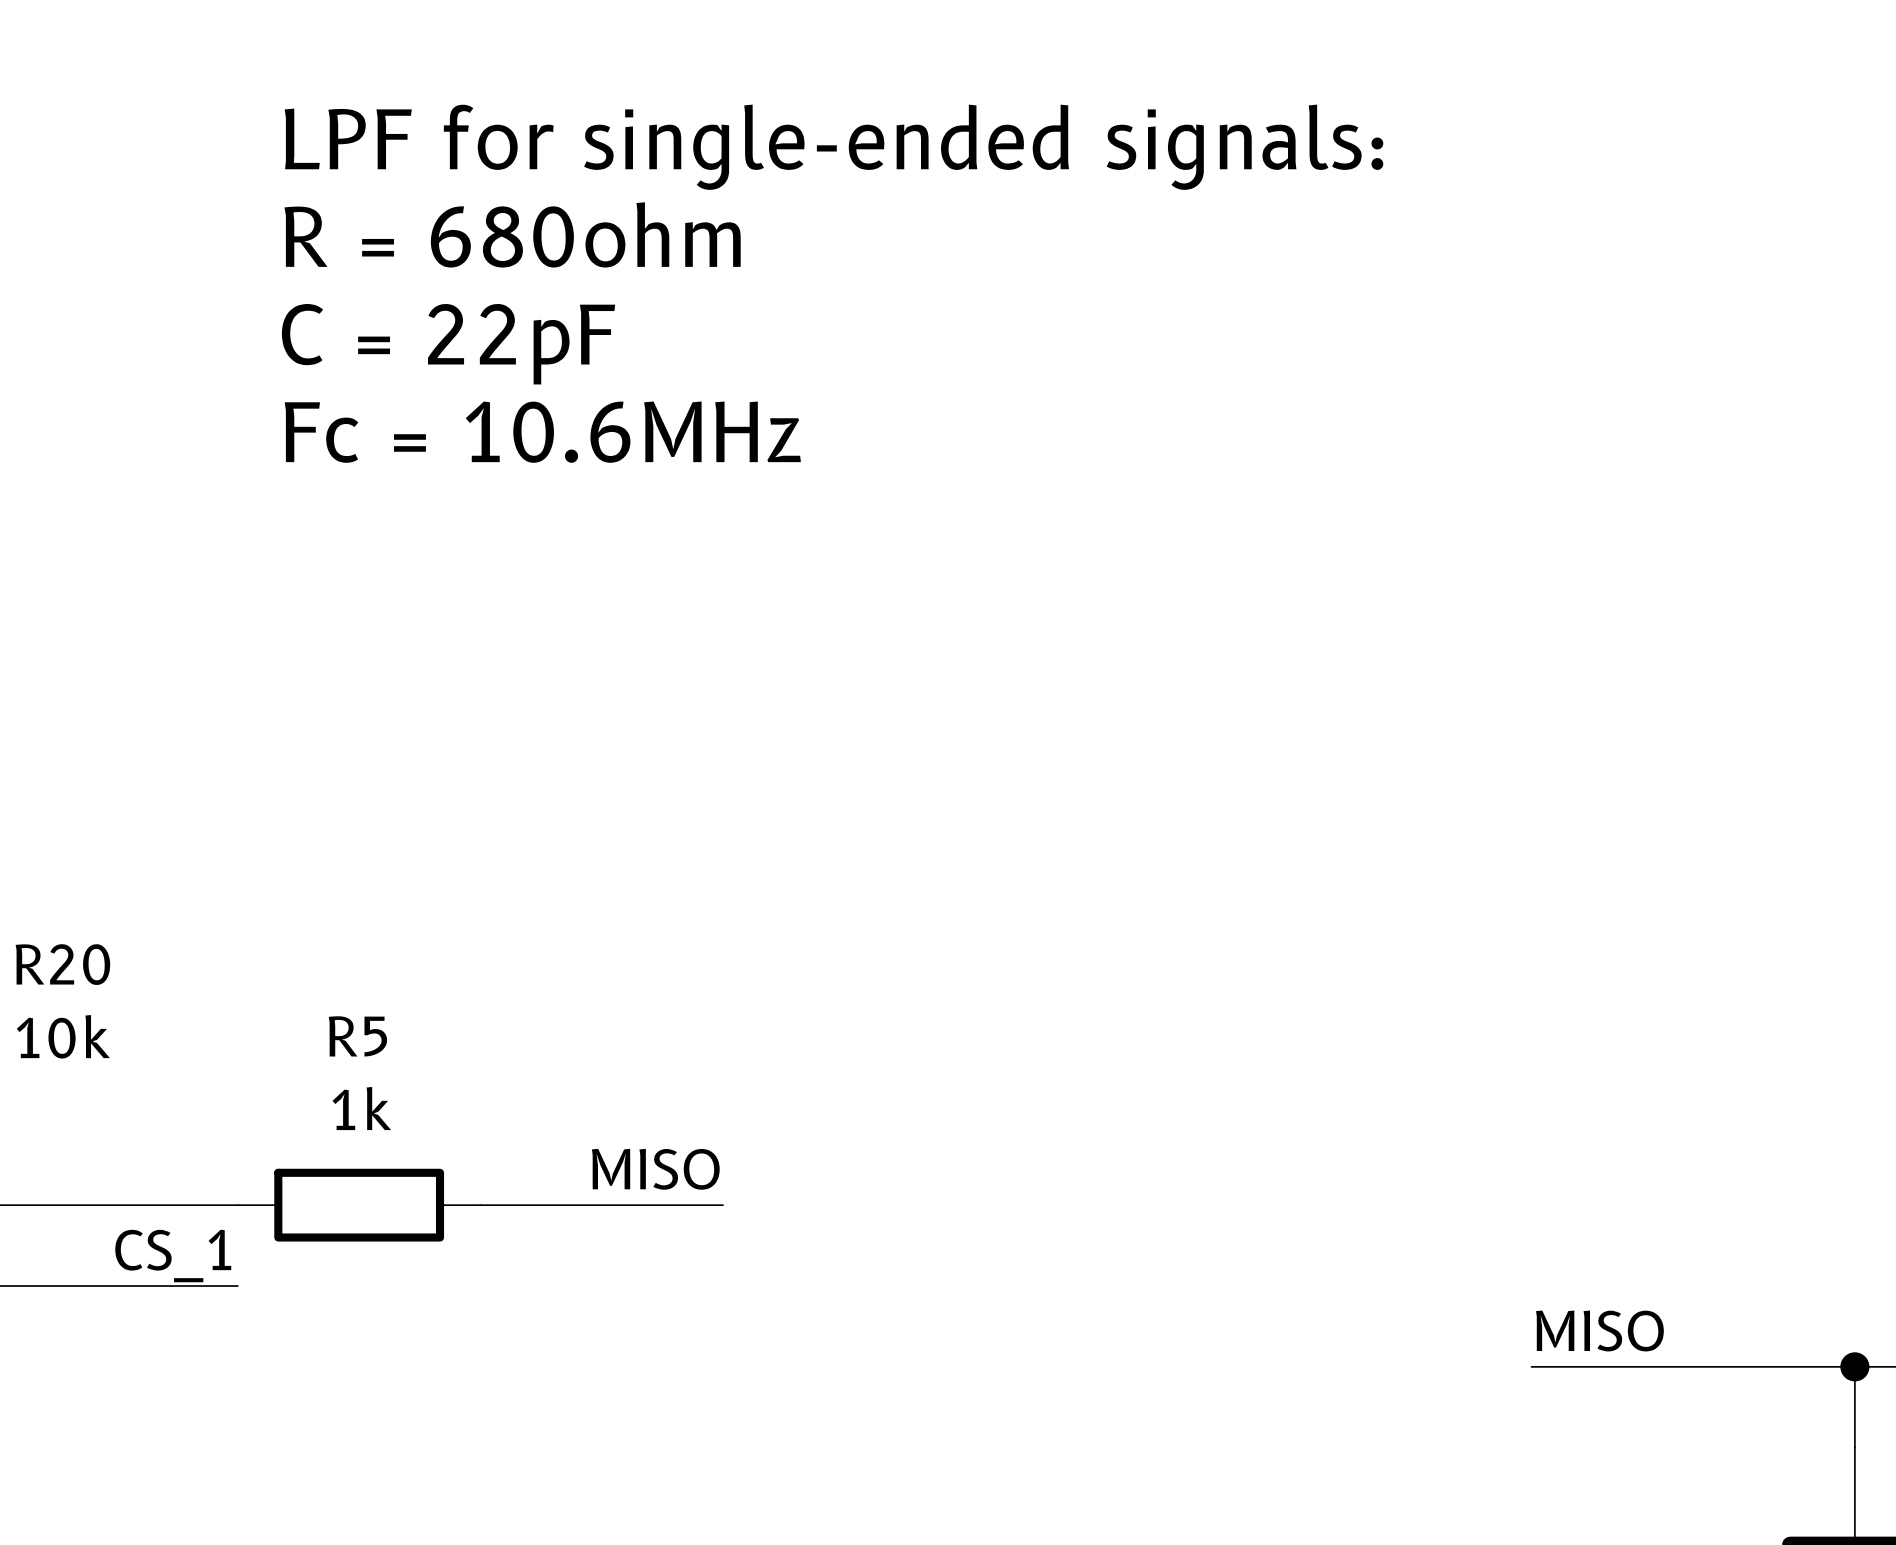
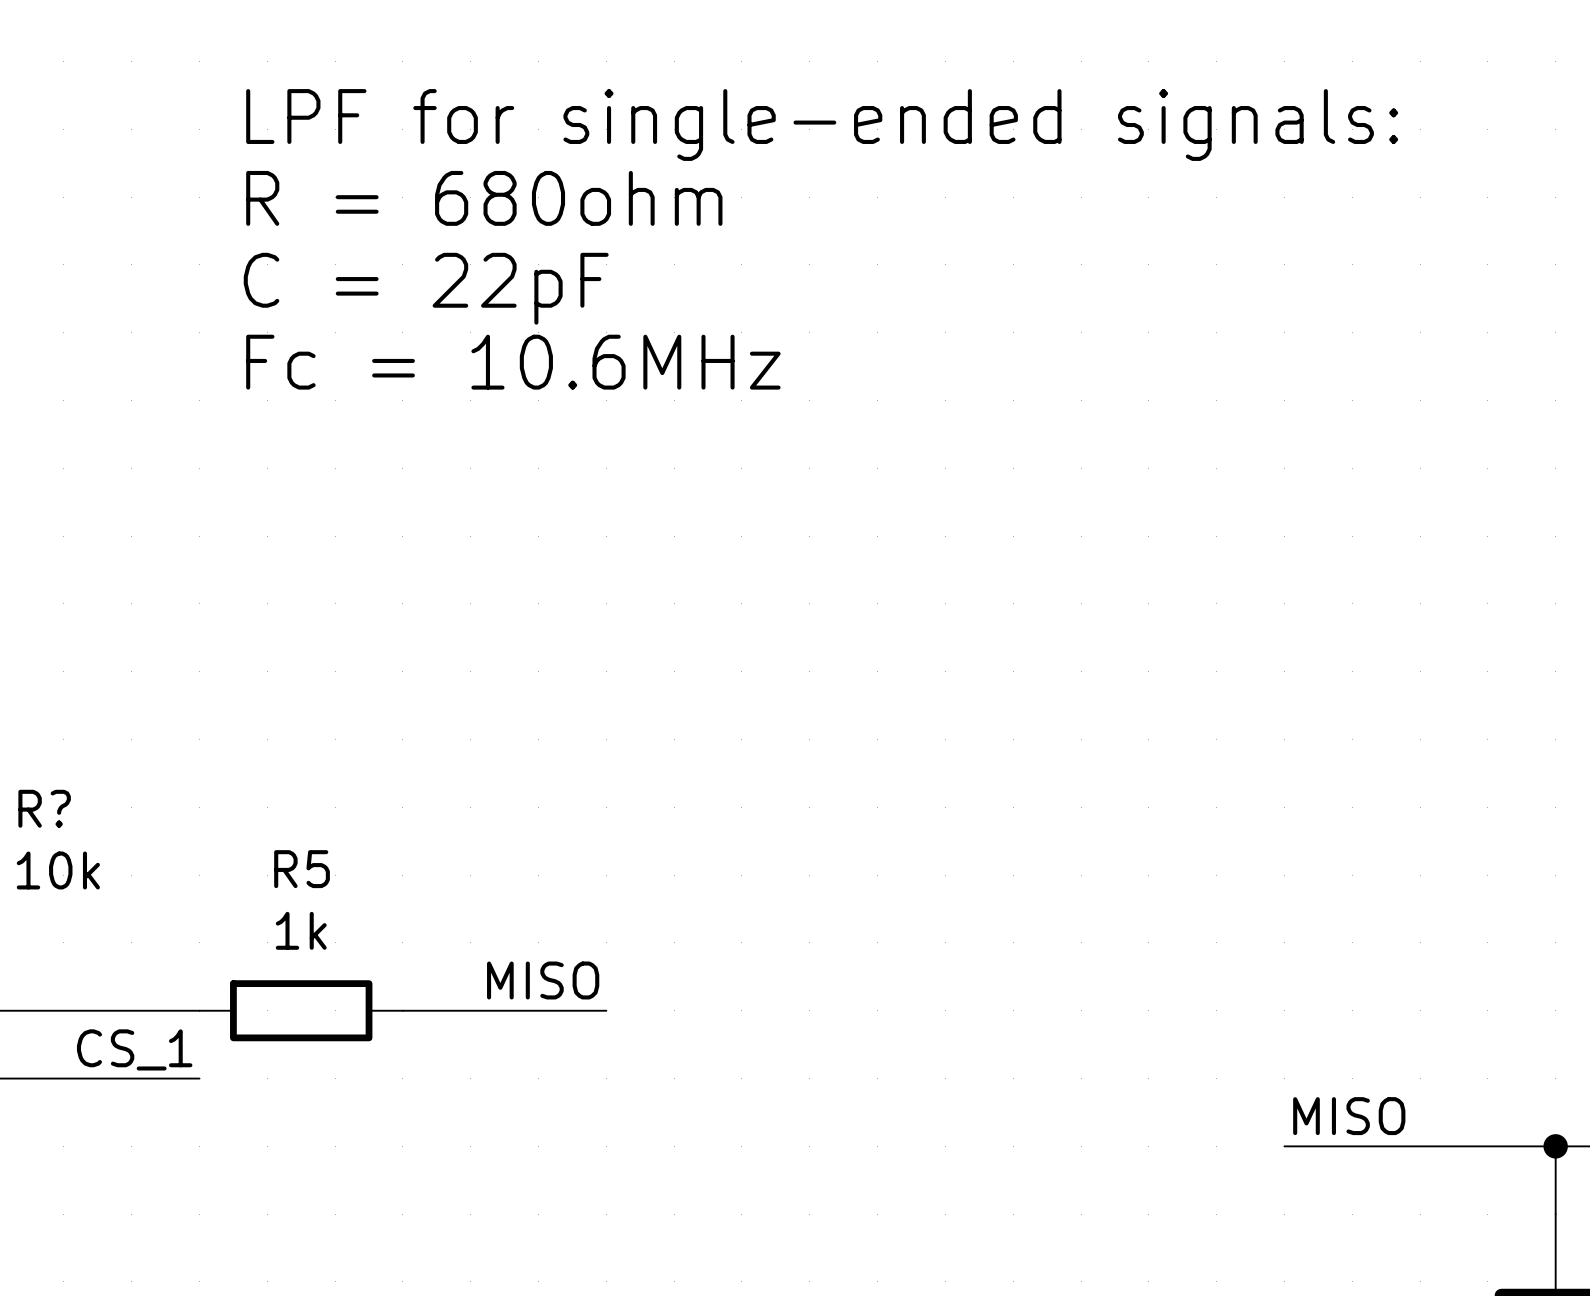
R20 name: R20 (62, 964) -> R? (44, 808)

